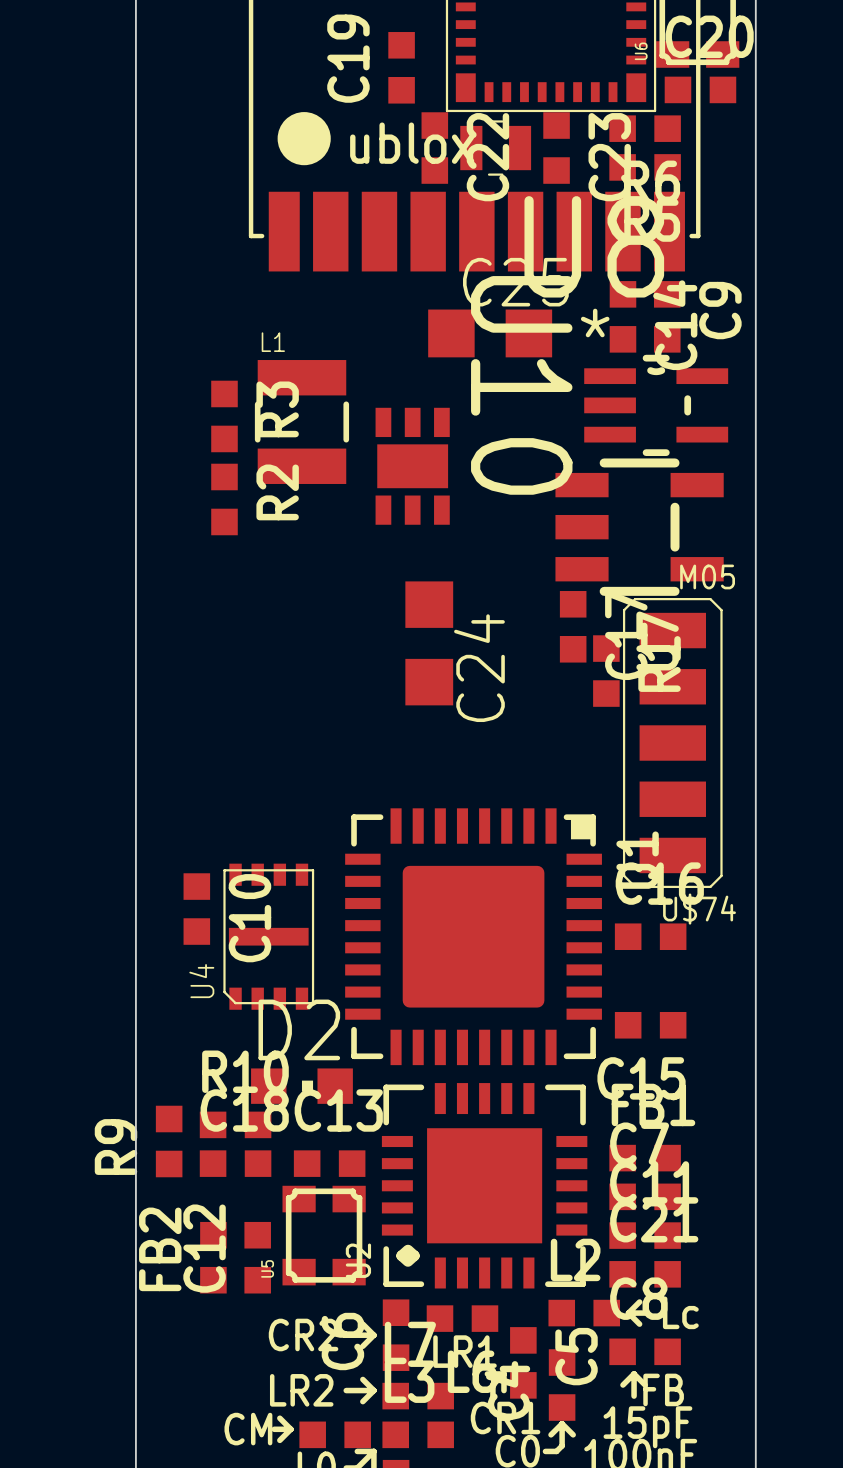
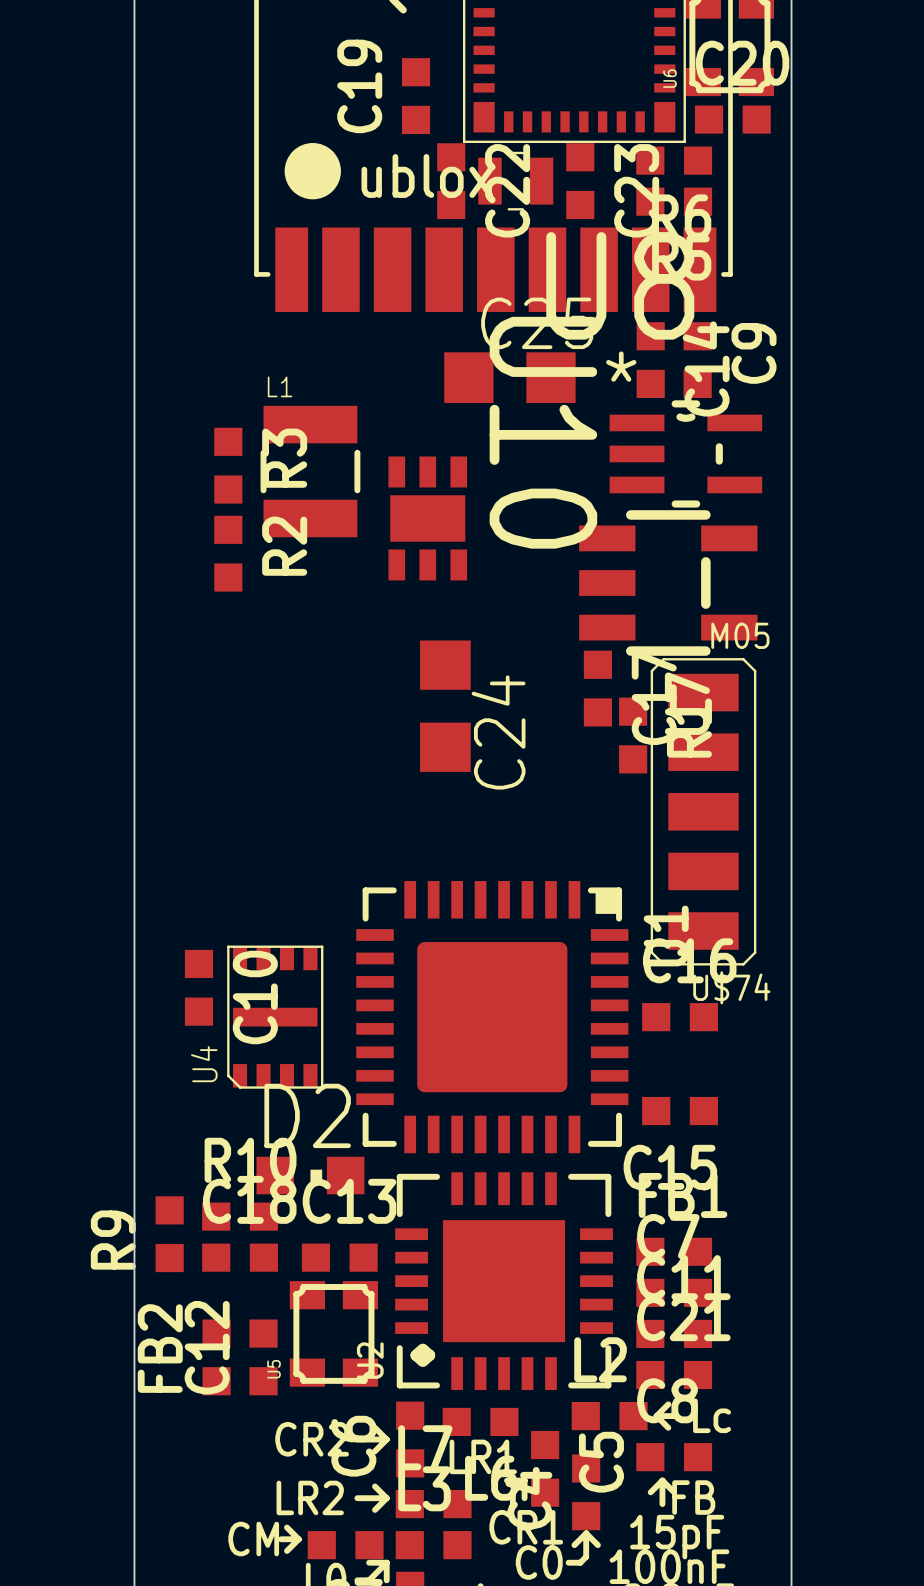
U4 footprint: [223, 863, 315, 1010] -> [227, 945, 324, 1089]

